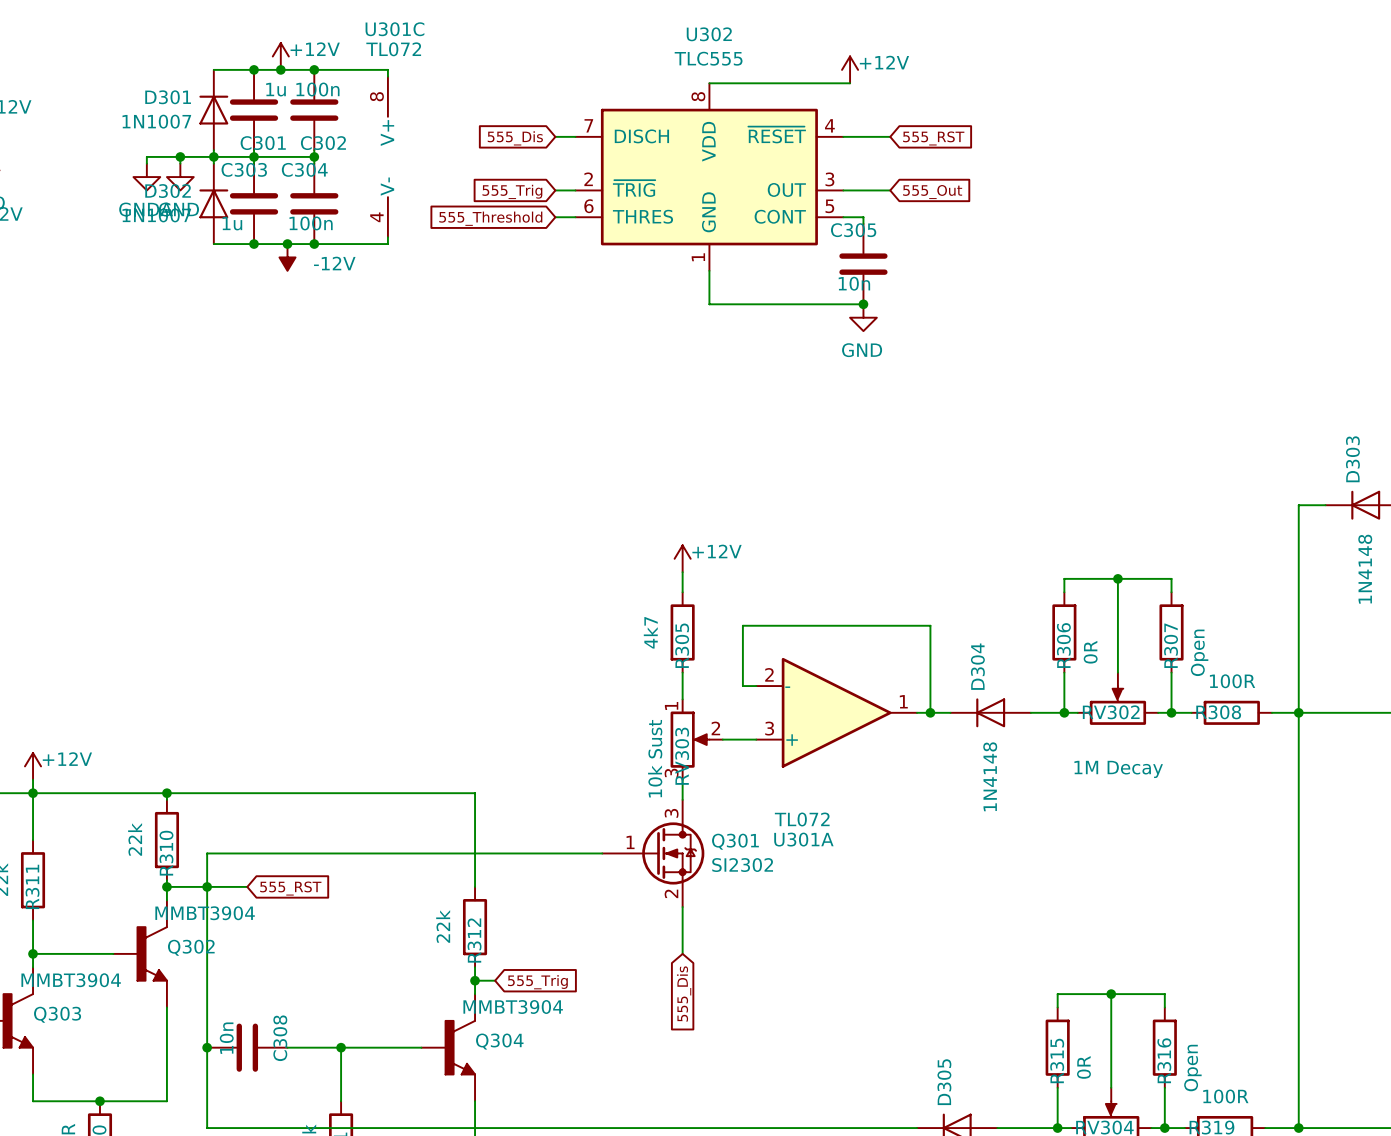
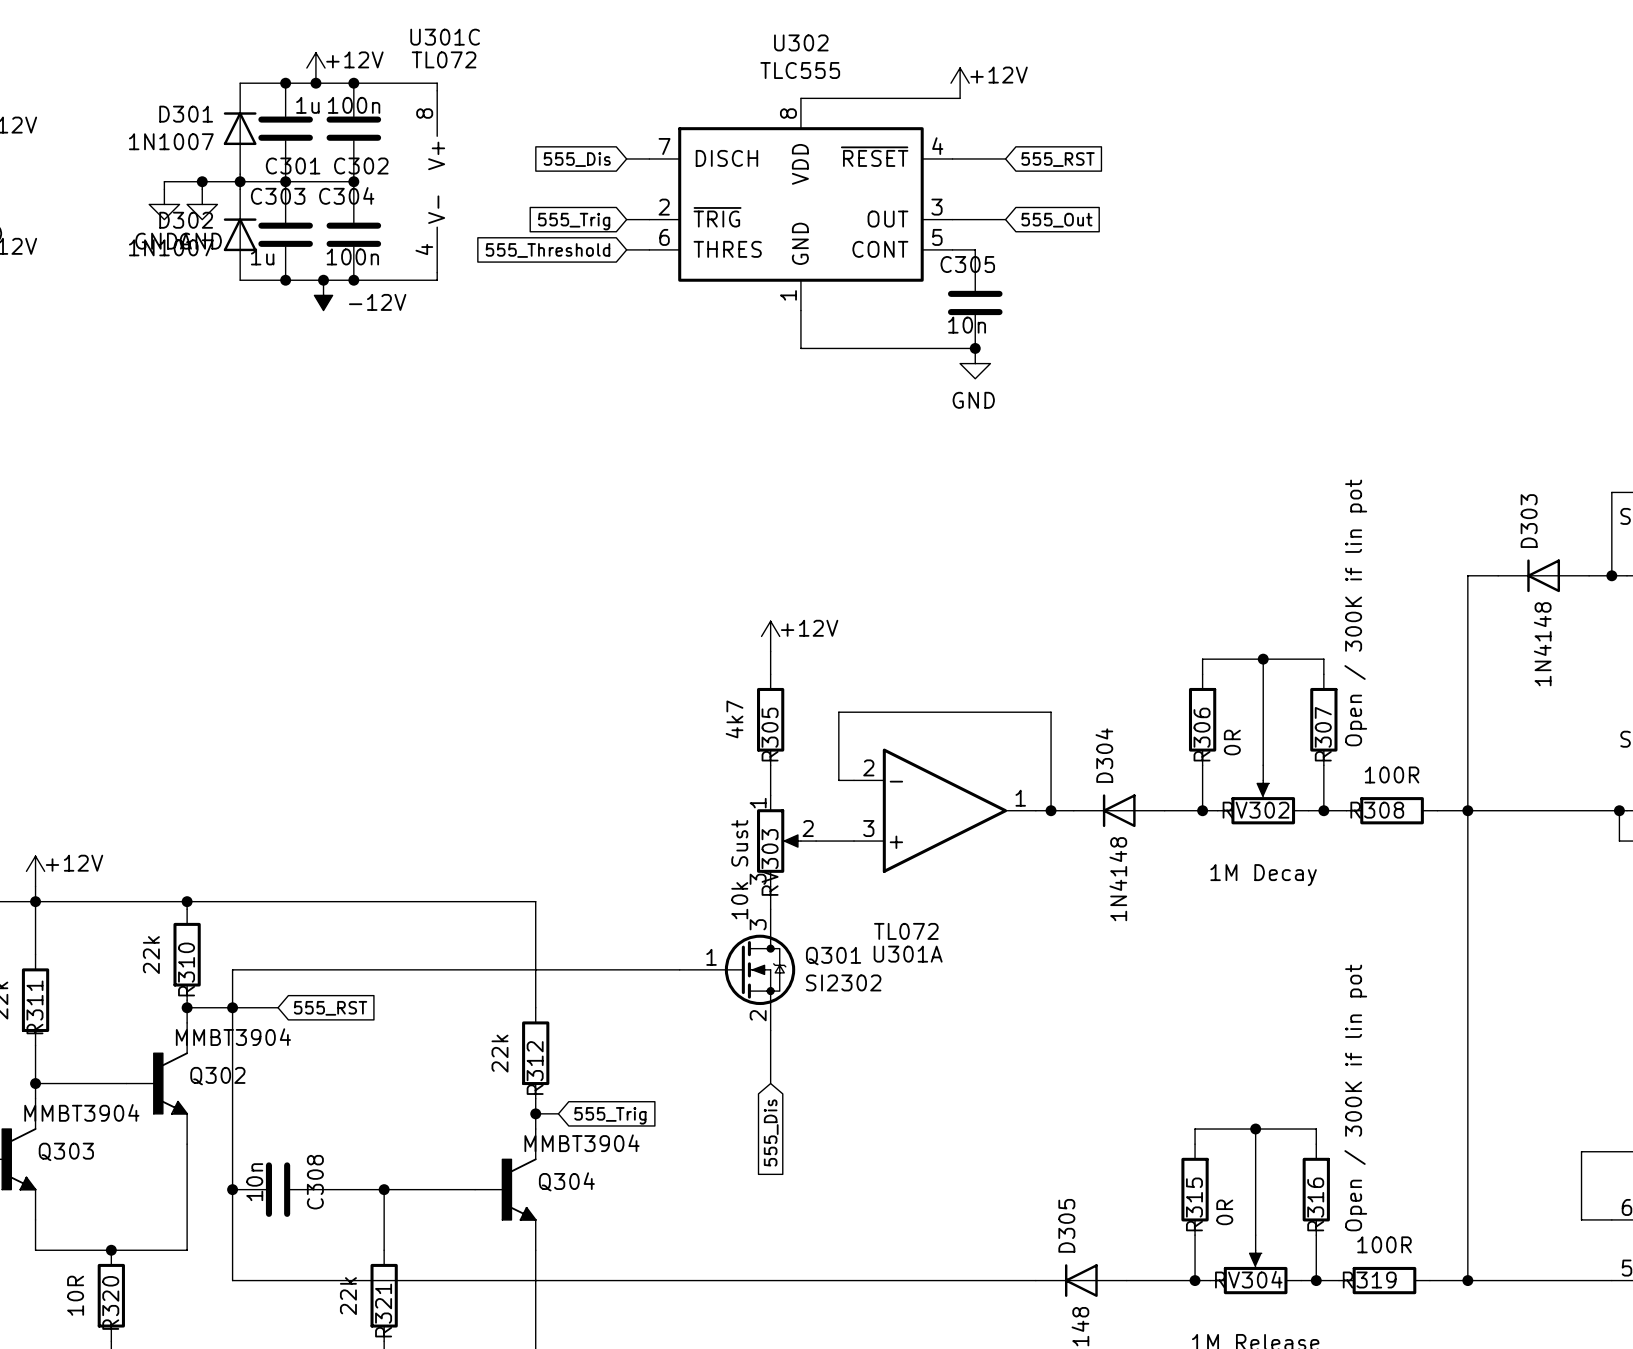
R307 value: Open (1199, 652) -> Open / 300K if lin pot (1355, 612)
R316 value: Open (1192, 1068) -> Open / 300K if lin pot (1355, 1097)

